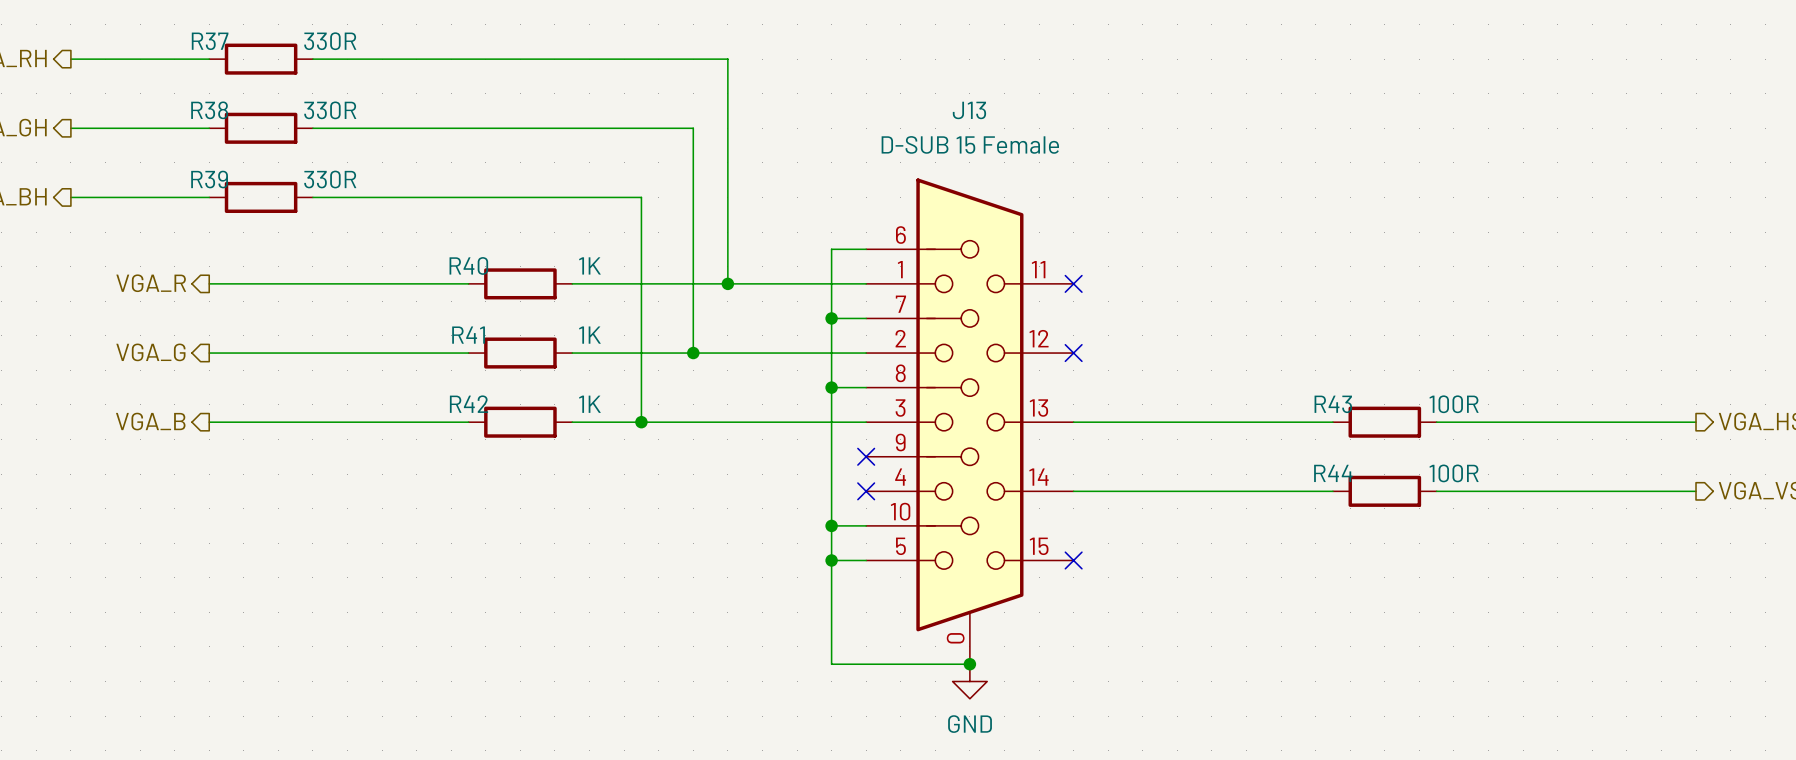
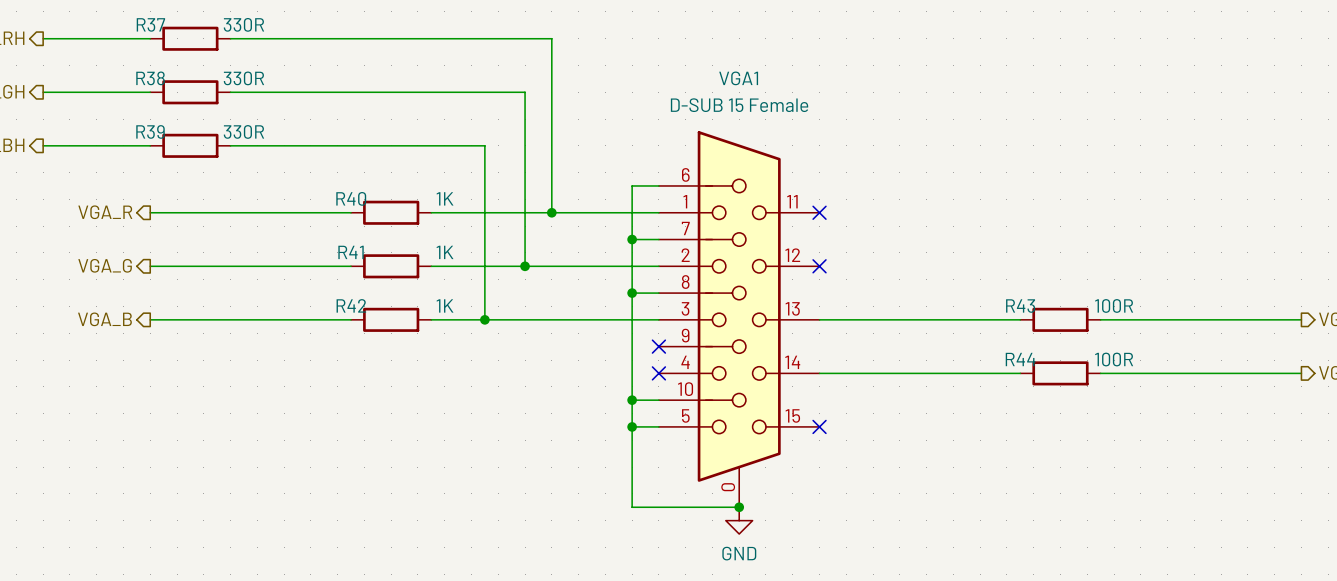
J13 name: J13 (969, 110) -> VGA1 (738, 78)

